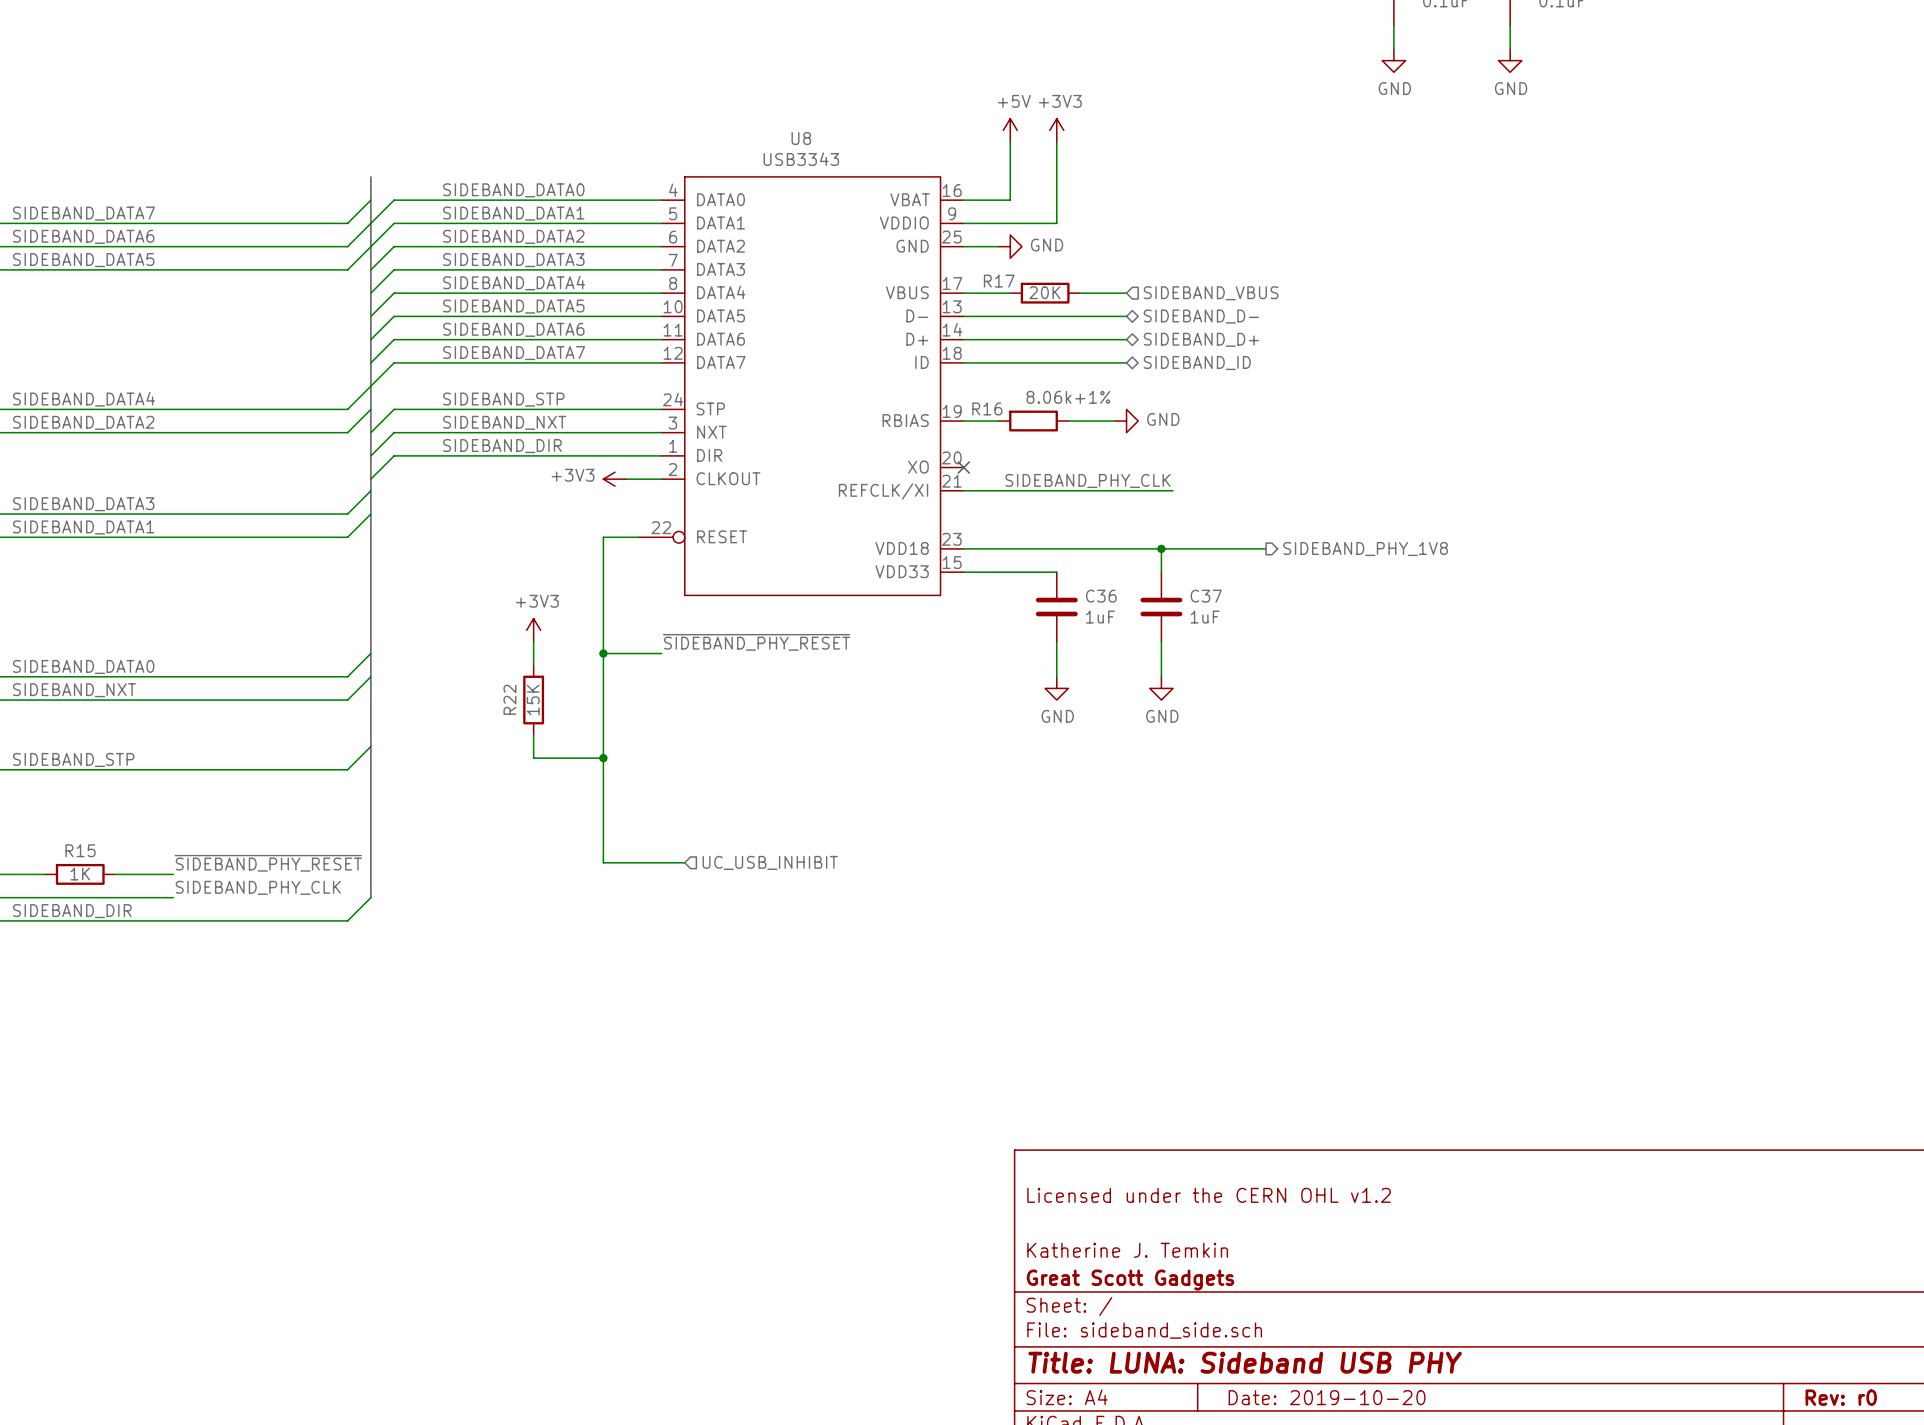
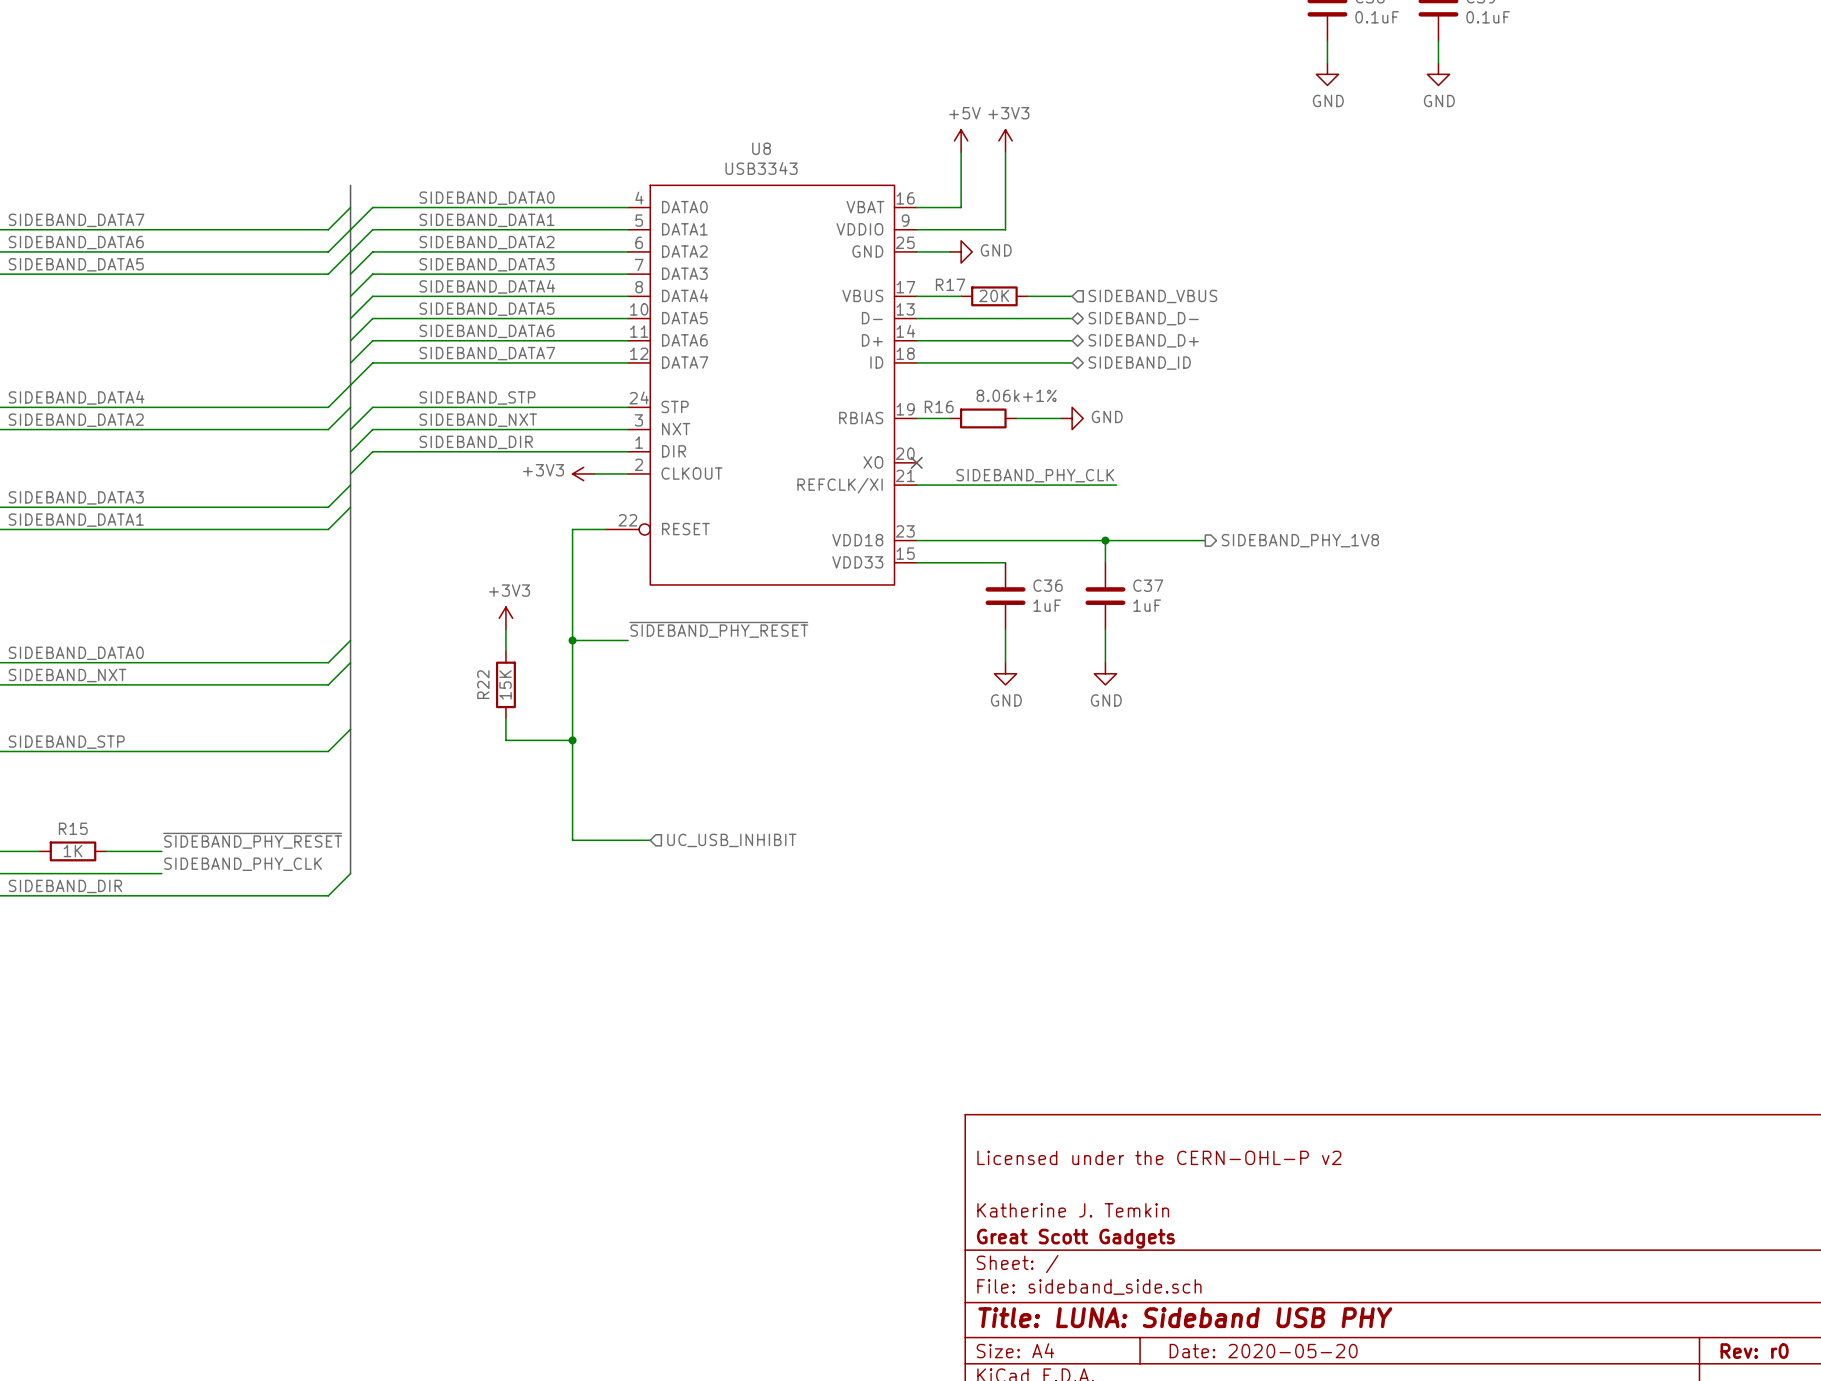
title block: Licensed under the CERN OHL v1.2 (1209, 1195) -> Licensed under the CERN-OHL-P v2 (1159, 1157)
title block: Date: 2019-10-20 (1327, 1397) -> Date: 2020-05-20 (1263, 1351)

